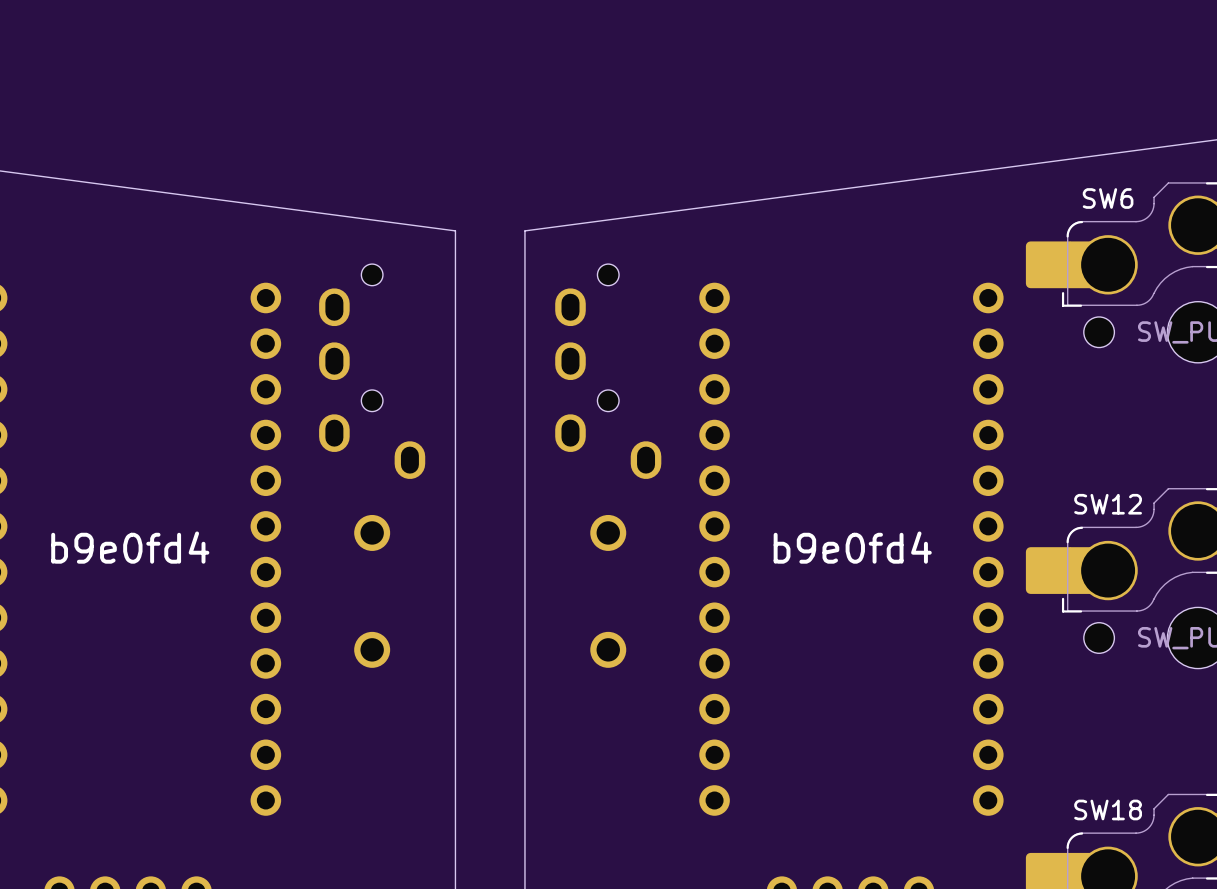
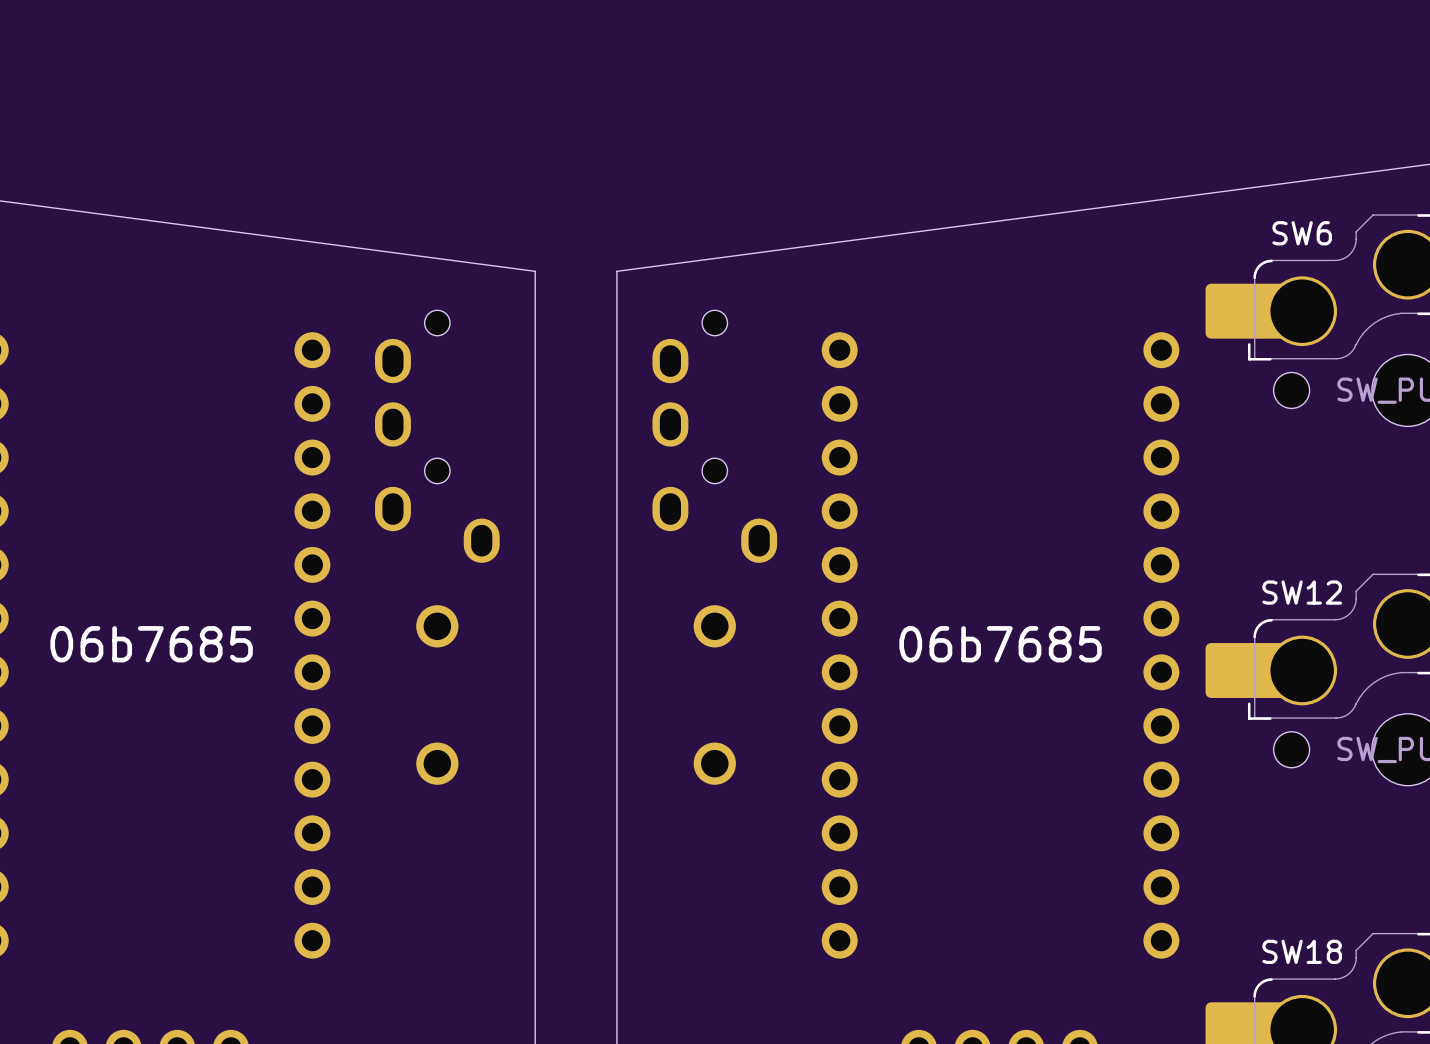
text: b9e0fd4 (130, 547) -> 06b7685 (151, 644)
text: b9e0fd4 (852, 547) -> 06b7685 (1000, 644)

